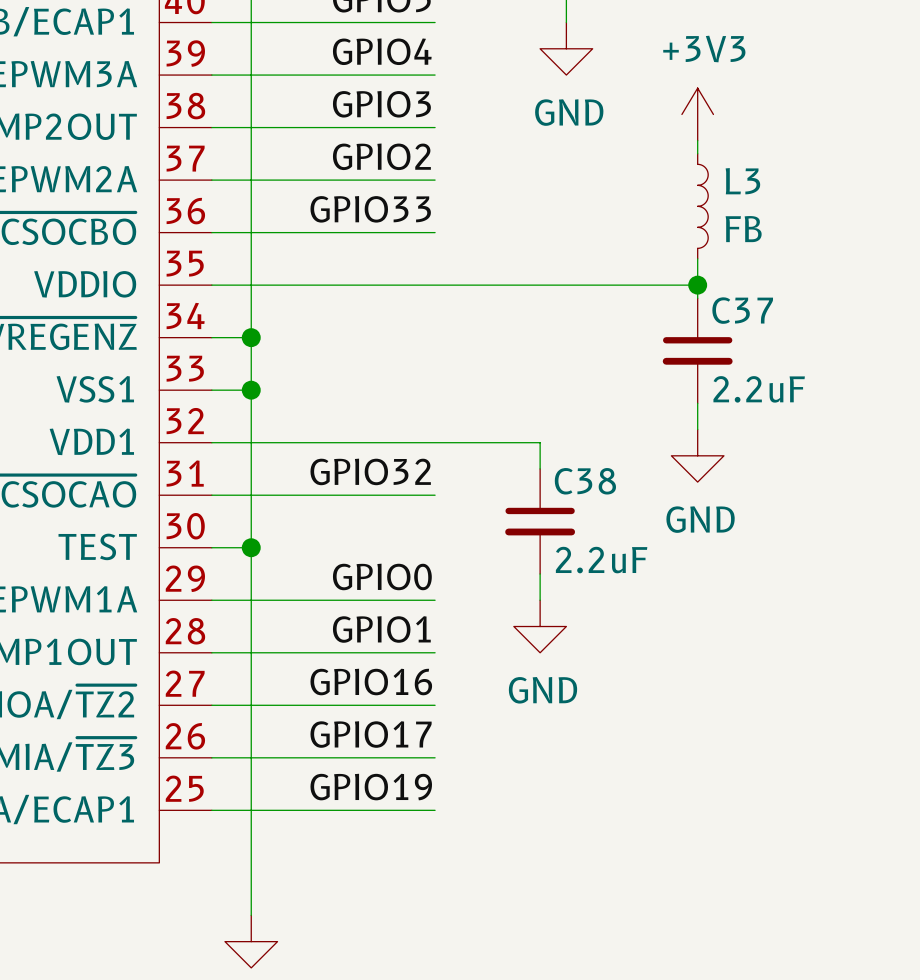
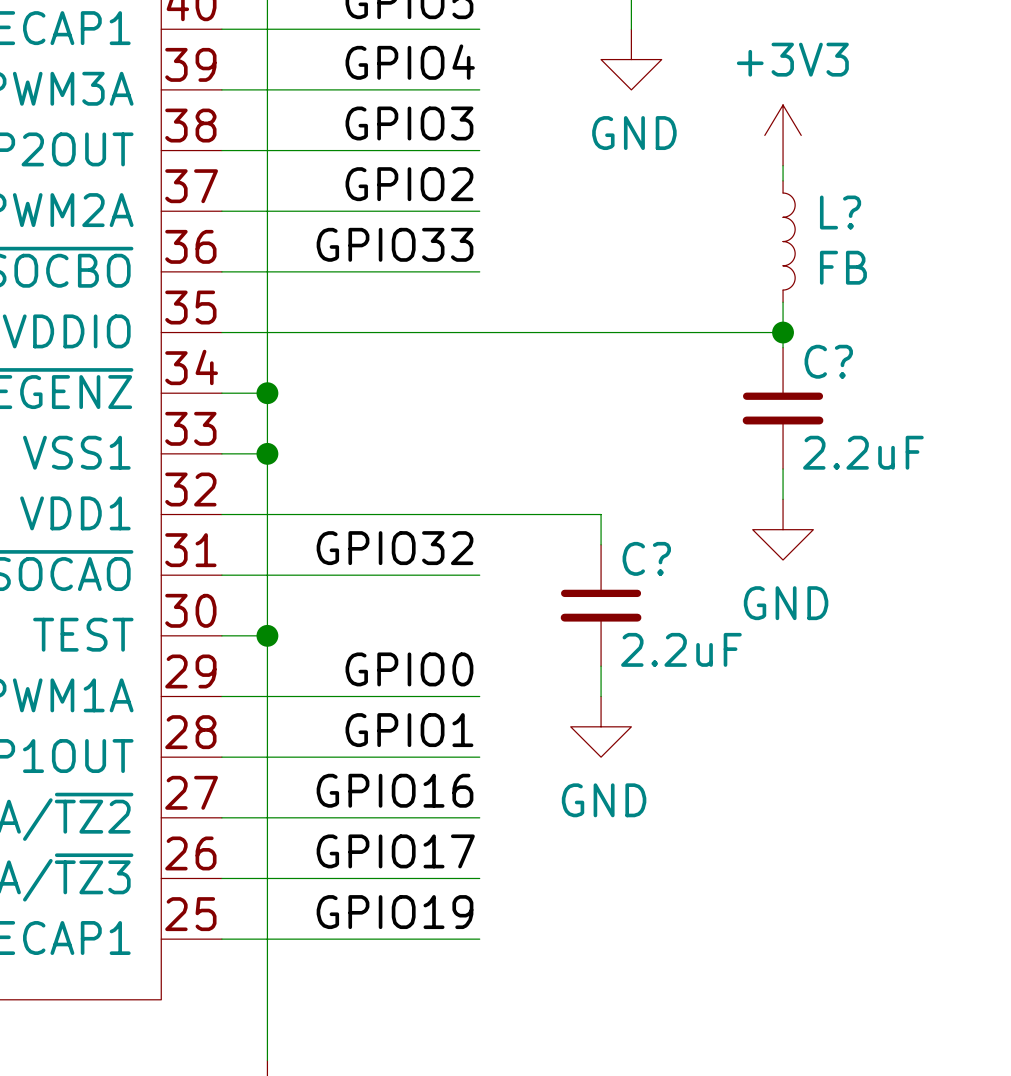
L3 name: L3 (742, 181) -> L? (840, 212)
C37 name: C37 (742, 310) -> C? (828, 361)
C38 name: C38 (585, 481) -> C? (646, 558)

